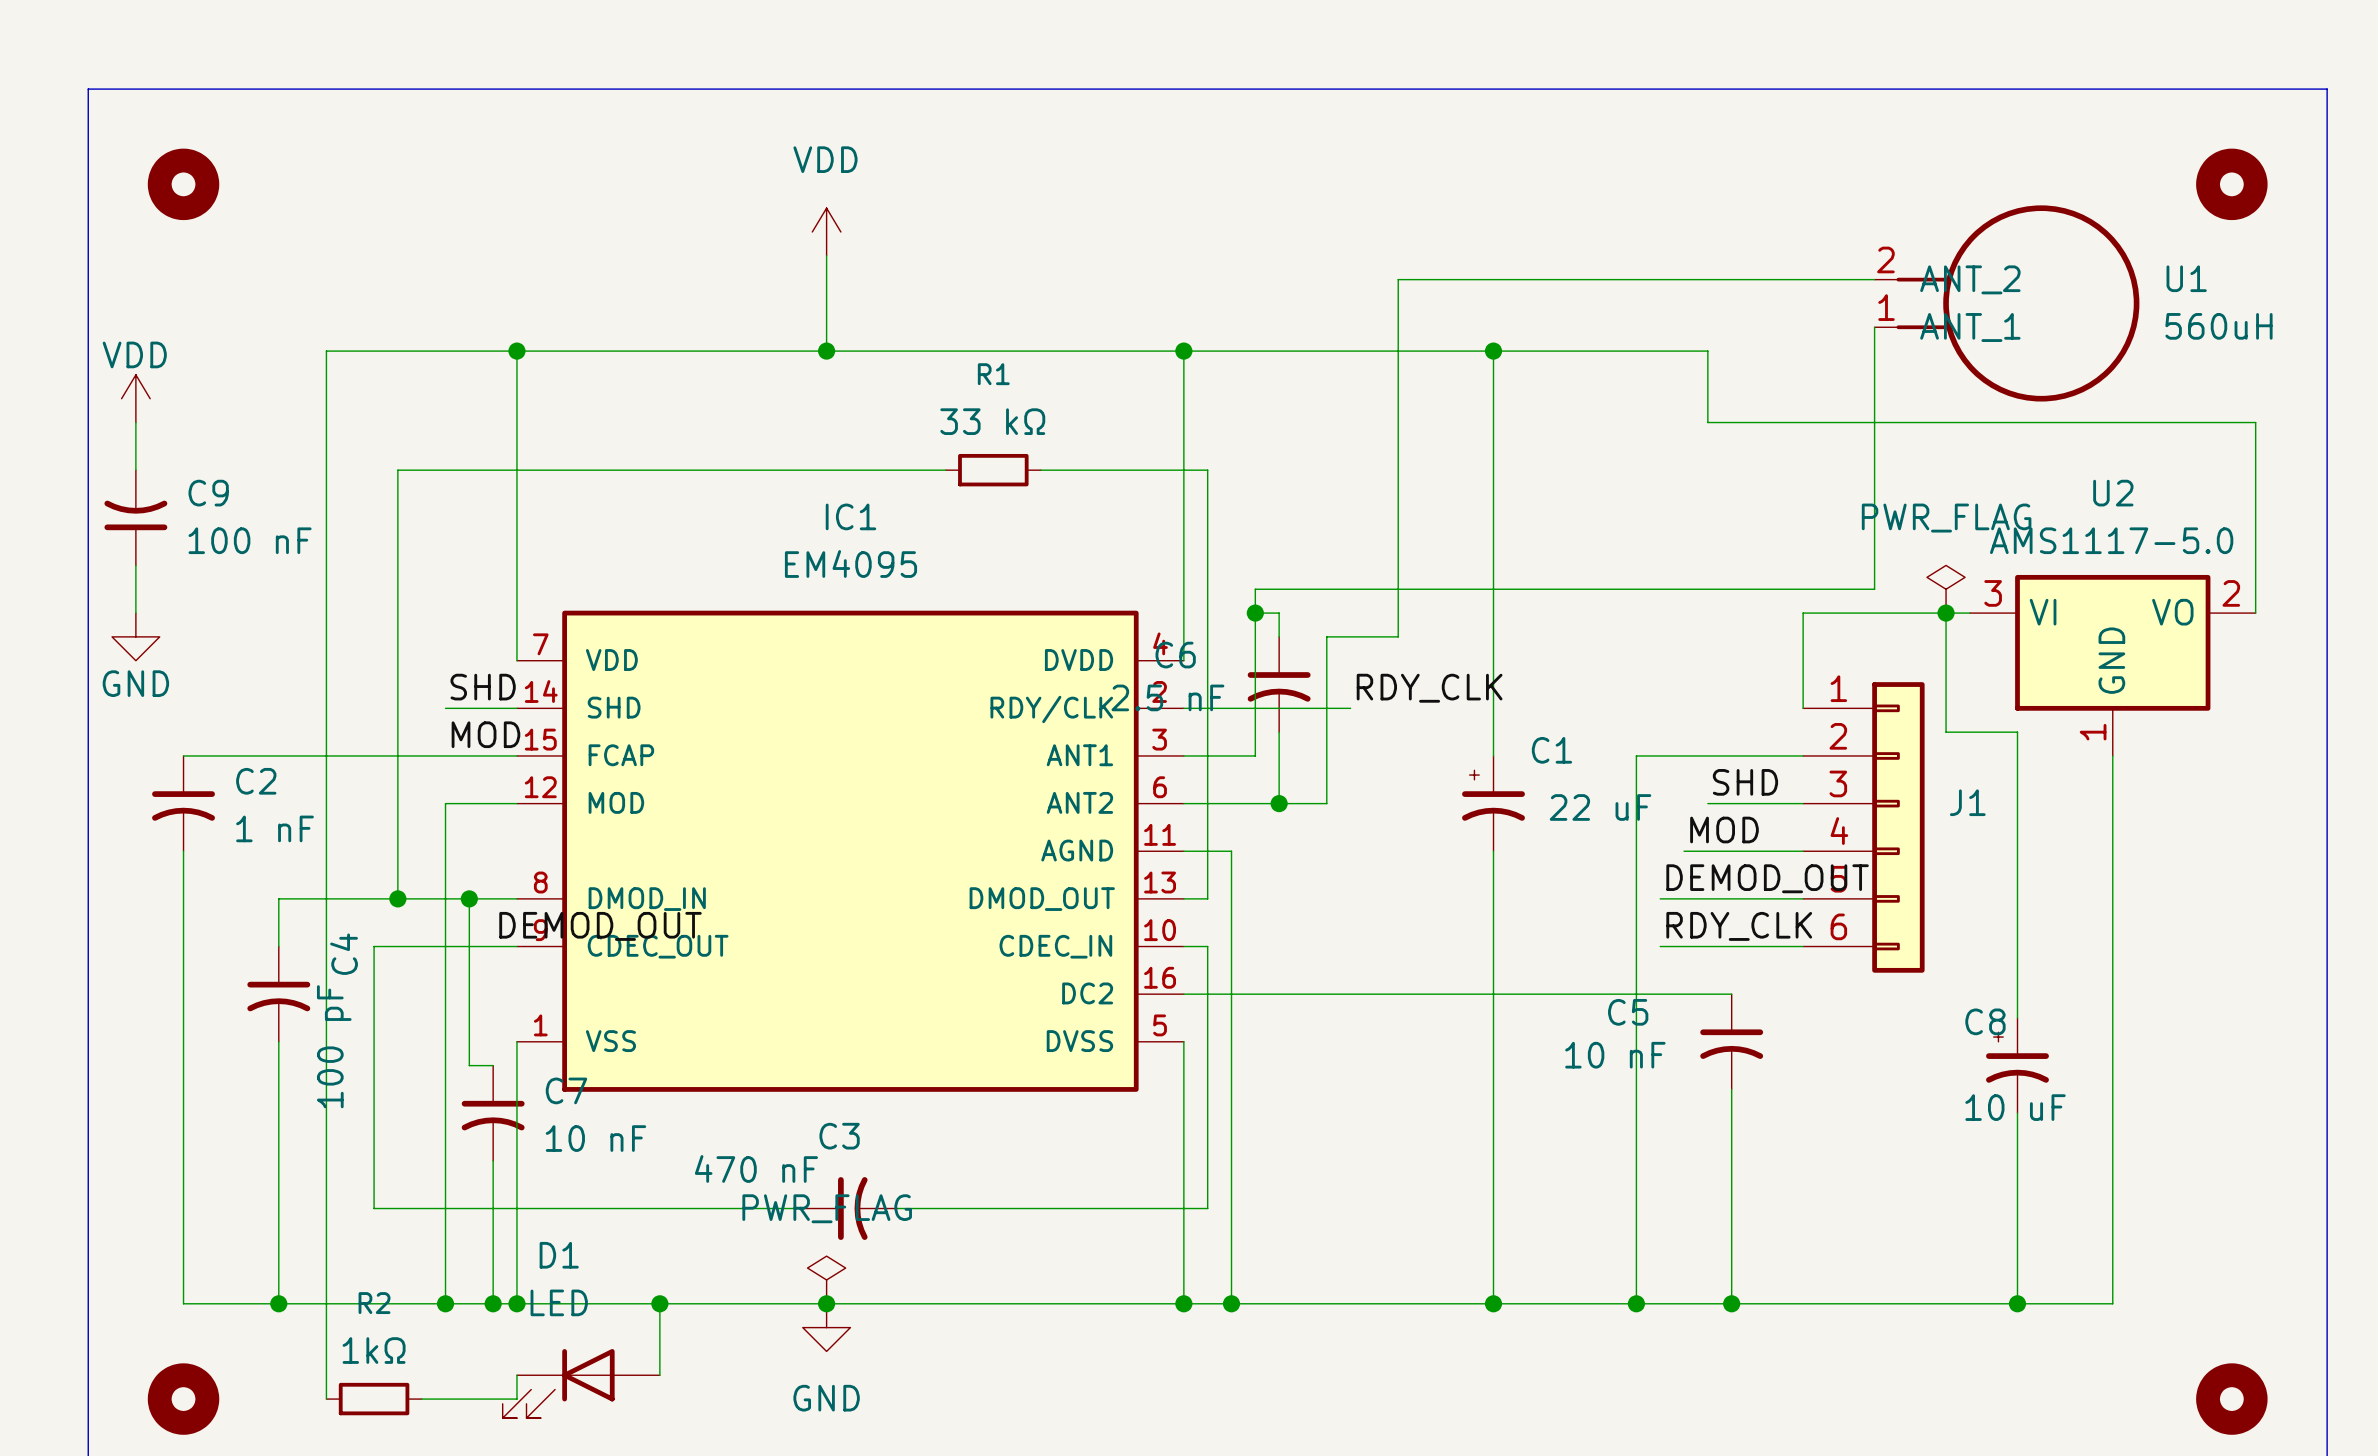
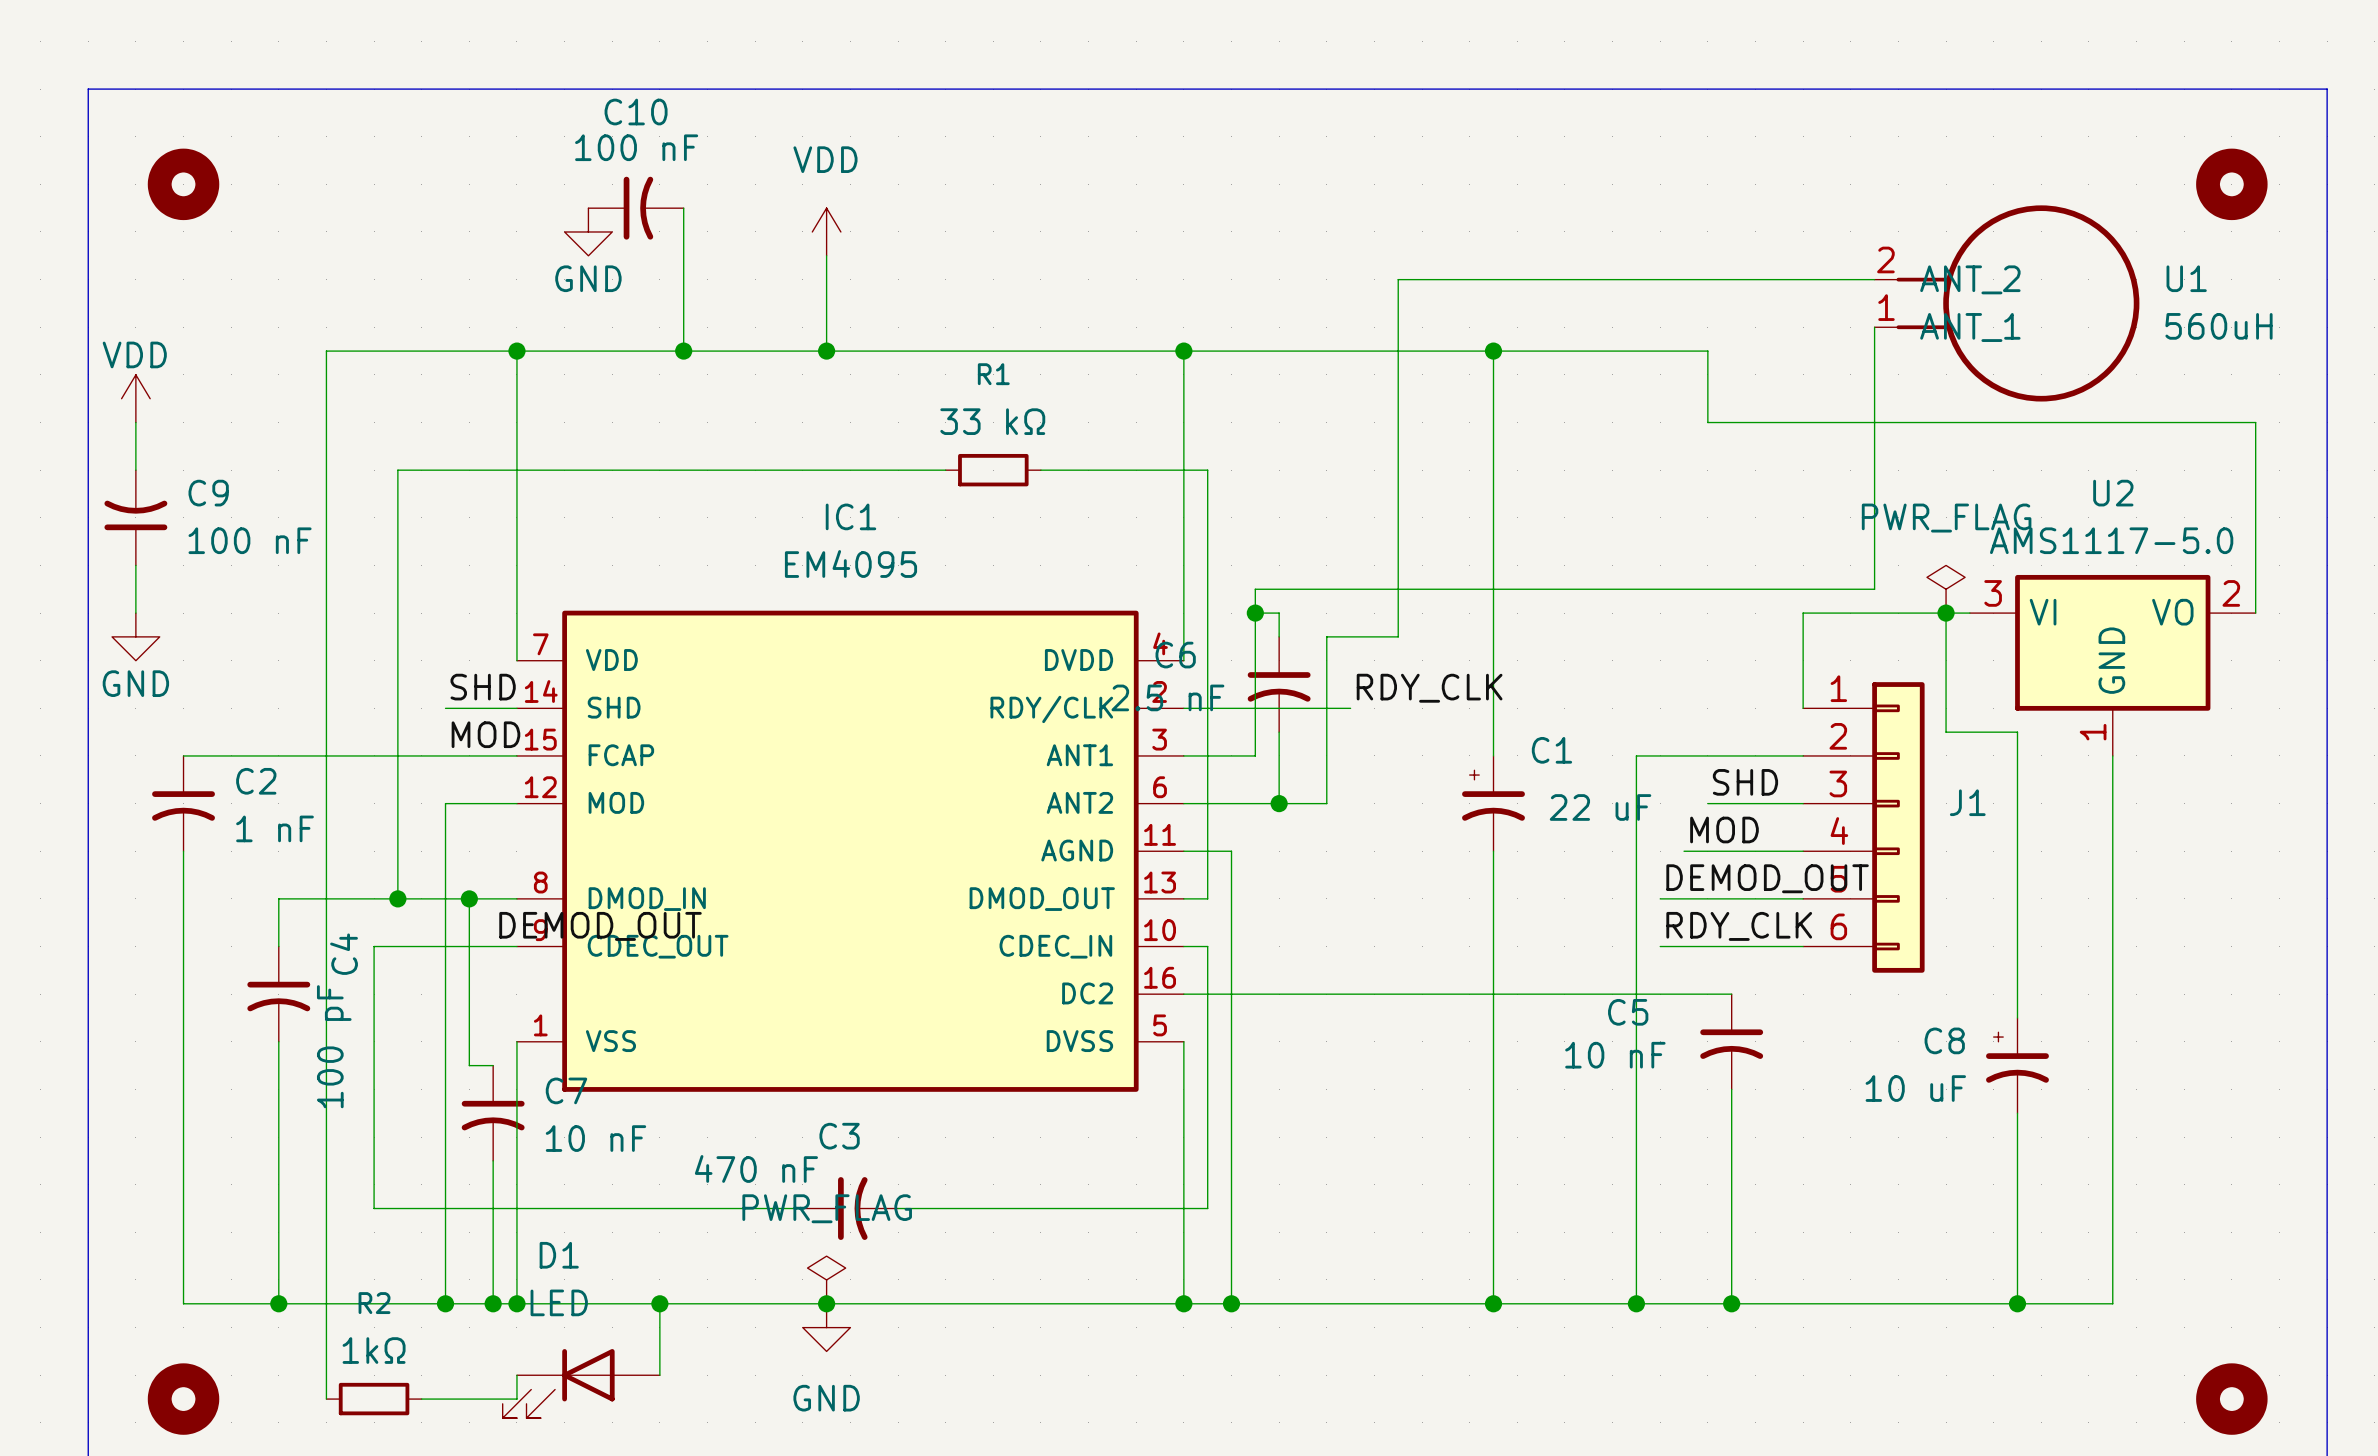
C10: none -> 100 nF (636, 208)
wire: none -> (683, 208) (683, 351)
power symbol: none -> GND (588, 231)
junction: none -> (683, 351)
C8 name position: C8 (1985, 1021) -> C8 (1944, 1040)
C8 value position: 10 uF (2015, 1107) -> 10 uF (1915, 1088)

